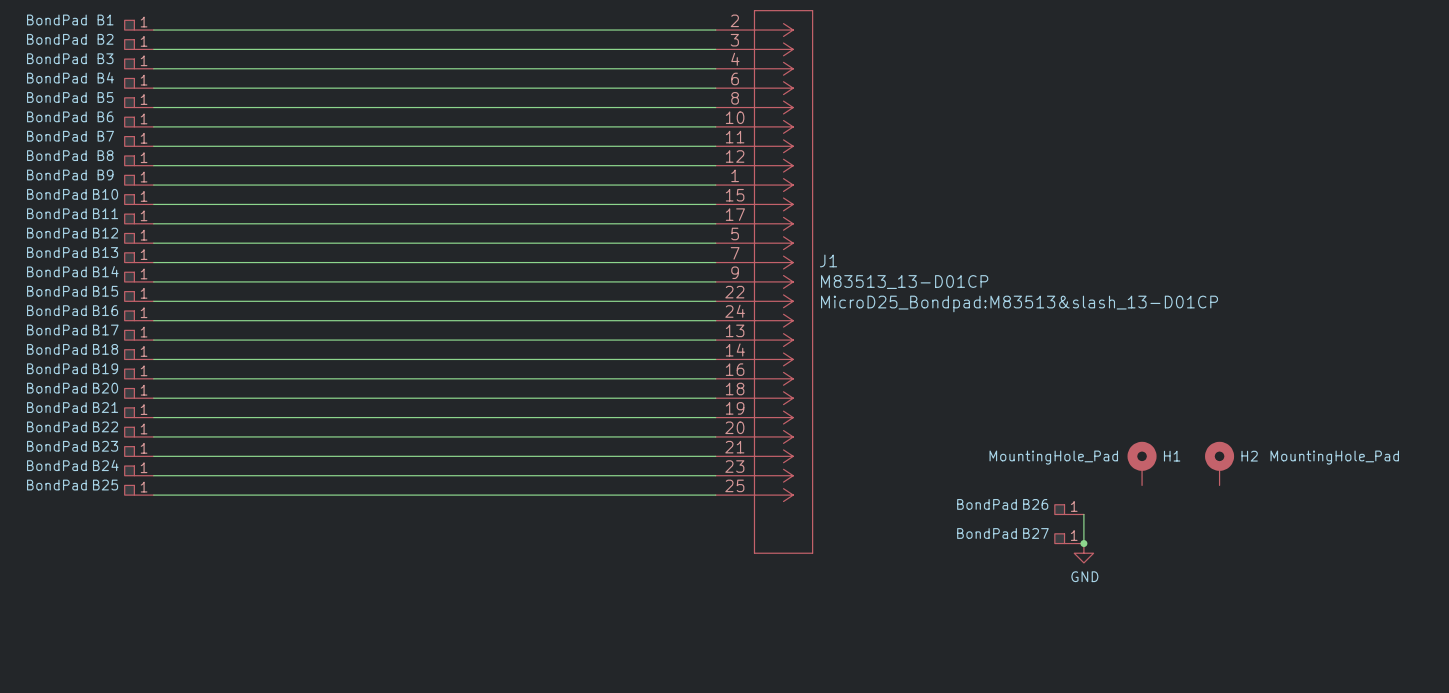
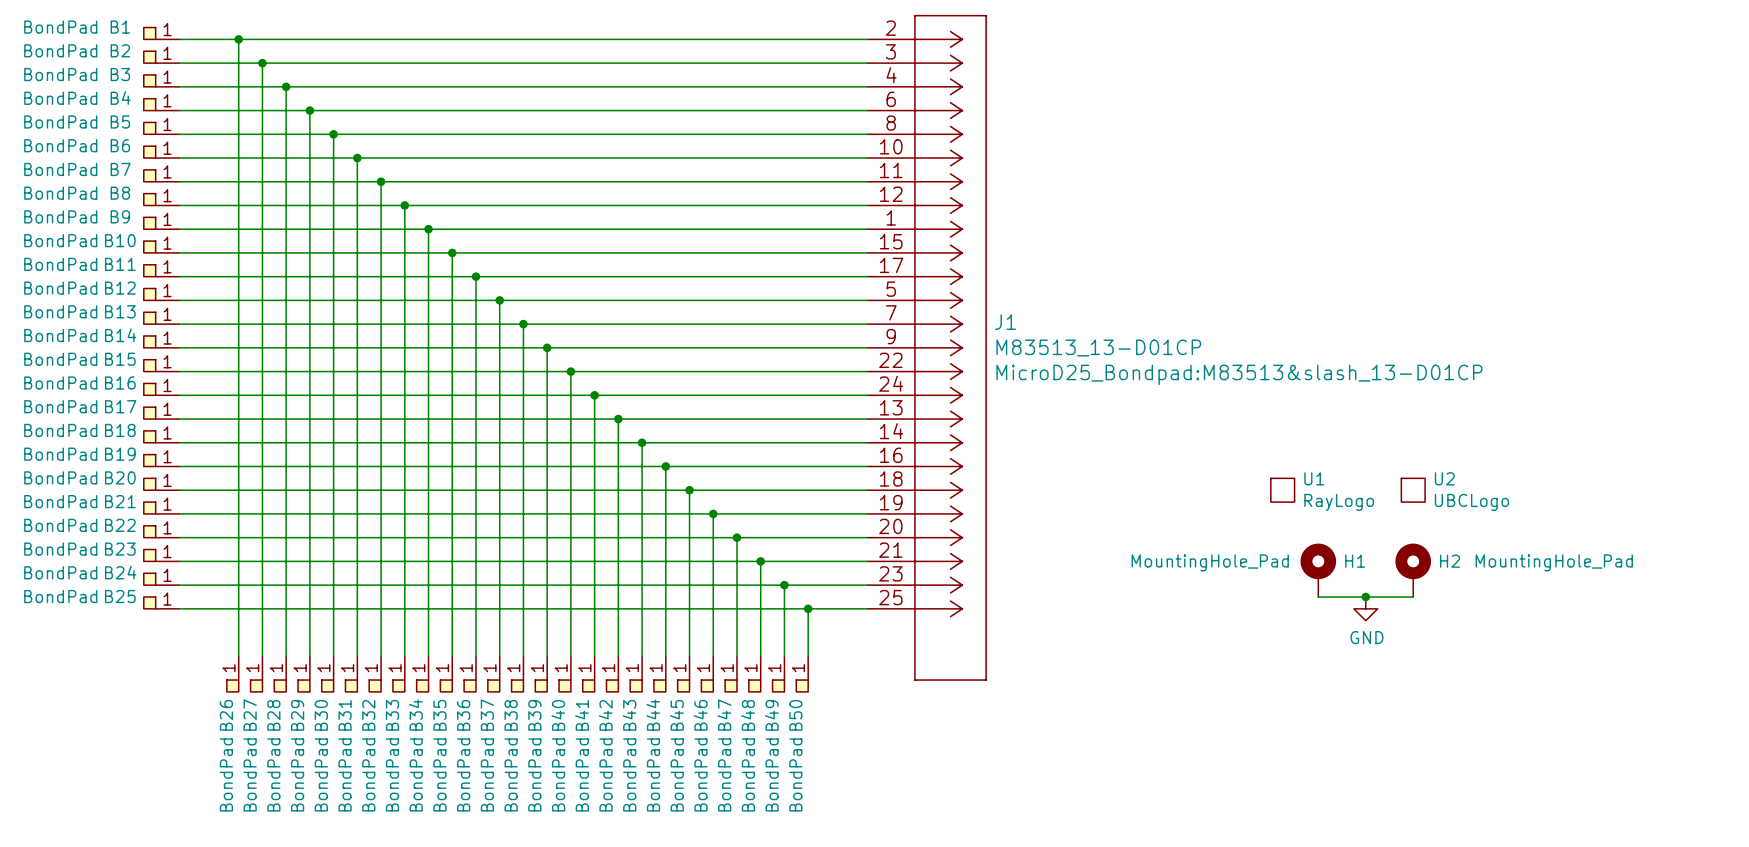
wire: none -> (238, 39) (238, 656)
junction: none -> (238, 39)
wire: none -> (262, 63) (262, 656)
junction: none -> (262, 63)
wire: none -> (286, 86) (286, 656)
junction: none -> (286, 86)
wire: none -> (309, 110) (309, 656)
junction: none -> (309, 110)
wire: none -> (333, 134) (333, 656)
junction: none -> (333, 134)
wire: none -> (357, 158) (357, 656)
junction: none -> (357, 158)
wire: none -> (381, 181) (381, 656)
junction: none -> (381, 181)
wire: none -> (404, 205) (404, 656)
junction: none -> (404, 205)
wire: none -> (428, 229) (428, 656)
junction: none -> (428, 229)
wire: none -> (452, 252) (452, 656)
junction: none -> (452, 252)
wire: none -> (475, 276) (475, 656)
junction: none -> (475, 276)
wire: none -> (499, 300) (499, 656)
junction: none -> (499, 300)
wire: none -> (523, 324) (523, 656)
junction: none -> (523, 324)
wire: none -> (547, 347) (547, 656)
junction: none -> (547, 347)
wire: none -> (570, 371) (570, 656)
junction: none -> (570, 371)
wire: none -> (594, 395) (594, 656)
junction: none -> (594, 395)
wire: none -> (618, 419) (618, 656)
junction: none -> (618, 419)
wire: none -> (642, 442) (642, 656)
junction: none -> (642, 442)
wire: none -> (665, 466) (665, 656)
junction: none -> (665, 466)
wire: none -> (689, 490) (689, 656)
junction: none -> (689, 490)
U1: none -> RayLogo (1282, 490)
U2: none -> UBCLogo (1413, 490)
wire: none -> (713, 513) (713, 656)
junction: none -> (713, 513)
wire: none -> (736, 537) (736, 656)
junction: none -> (736, 537)
wire: none -> (760, 561) (760, 656)
junction: none -> (760, 561)
H1 position: (1142, 463) -> (1318, 570)
H2 position: (1219, 463) -> (1413, 570)
wire: none -> (784, 585) (784, 656)
junction: none -> (784, 585)
wire: none -> (1318, 596) (1413, 596)
junction: none -> (1365, 596)
wire: none -> (808, 608) (808, 656)
junction: none -> (808, 608)
B26 rotation: 0° (1059, 509) -> 90° counterclockwise (232, 685)
B26 position: (1069, 509) -> (232, 674)
wire: (1083, 514) (1083, 543) -> none
B27 rotation: 0° (1059, 538) -> 90° counterclockwise (256, 685)
B27 position: (1069, 538) -> (256, 674)
junction: (1083, 543) -> none
B28: none -> BondPad (280, 674)
B29: none -> BondPad (303, 674)
B30: none -> BondPad (327, 674)
B31: none -> BondPad (351, 674)
B32: none -> BondPad (375, 674)
B33: none -> BondPad (398, 674)
B34: none -> BondPad (422, 674)
B35: none -> BondPad (446, 674)
B36: none -> BondPad (470, 674)
B37: none -> BondPad (493, 674)
B38: none -> BondPad (517, 674)
B39: none -> BondPad (541, 674)
B40: none -> BondPad (564, 674)
B41: none -> BondPad (588, 674)
B42: none -> BondPad (612, 674)
B43: none -> BondPad (636, 674)
B44: none -> BondPad (659, 674)
B45: none -> BondPad (683, 674)
B46: none -> BondPad (707, 674)
B47: none -> BondPad (731, 674)
B48: none -> BondPad (754, 674)
B49: none -> BondPad (778, 674)
B50: none -> BondPad (802, 674)
power symbol position: GND (1083, 553) -> GND (1365, 608)

